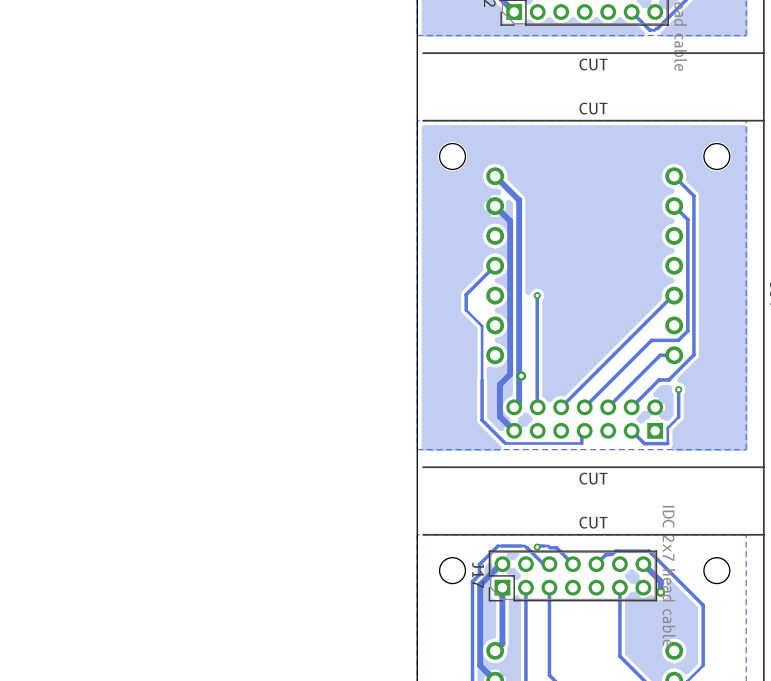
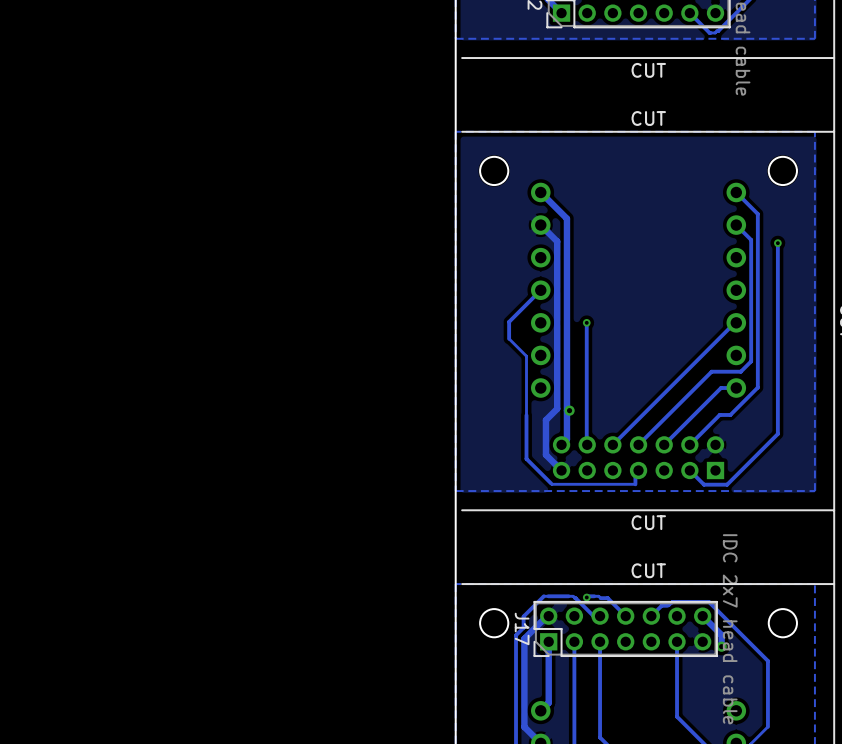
via: none -> (777, 243)
track: (678, 389) (678, 417) (667, 428) (667, 443) (644, 443) -> (777, 243) (777, 433) (727, 484) (703, 484)
via: (678, 389) -> none

